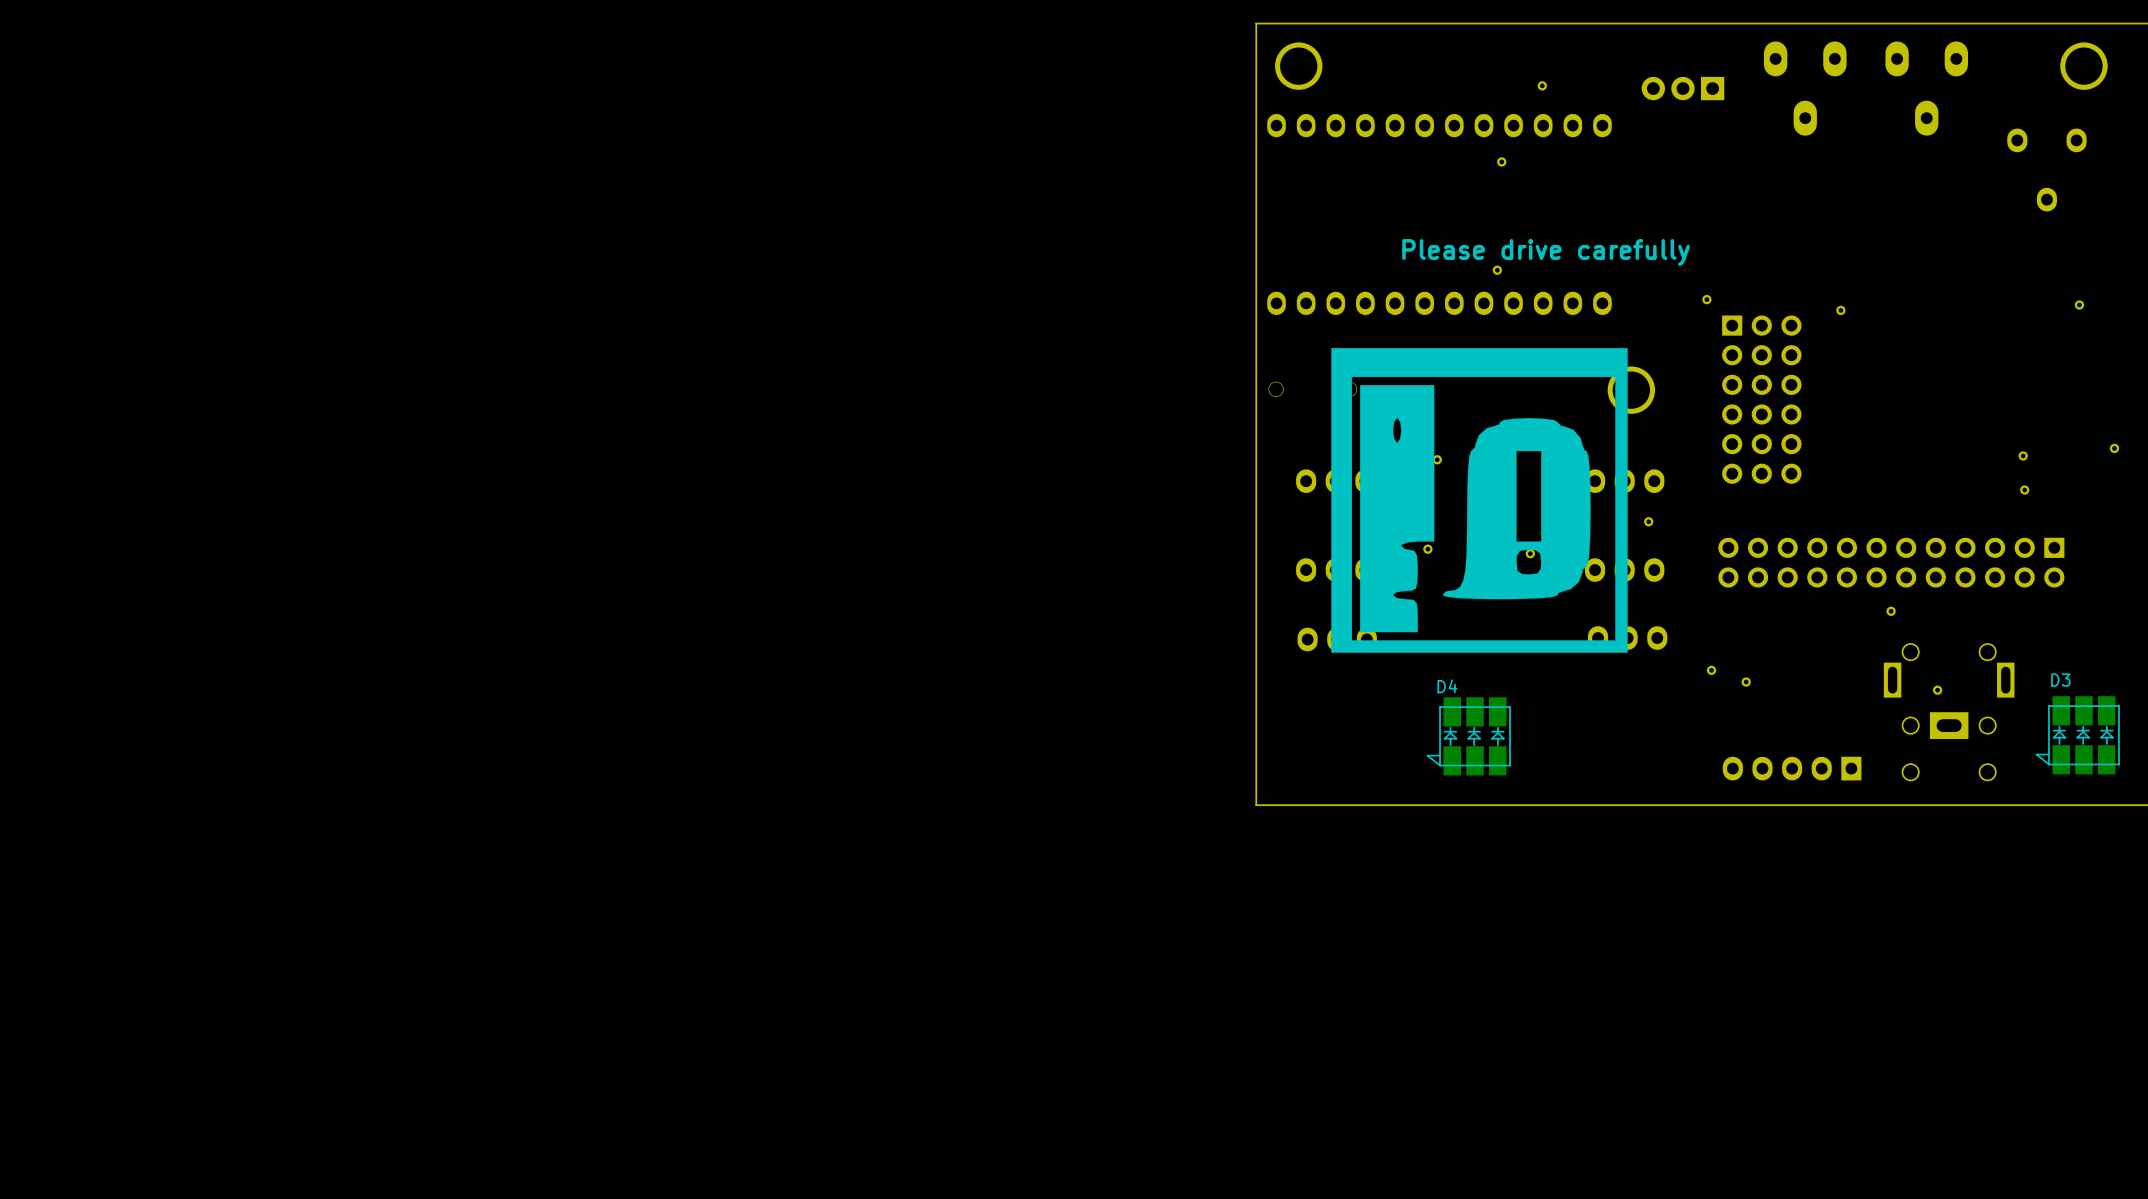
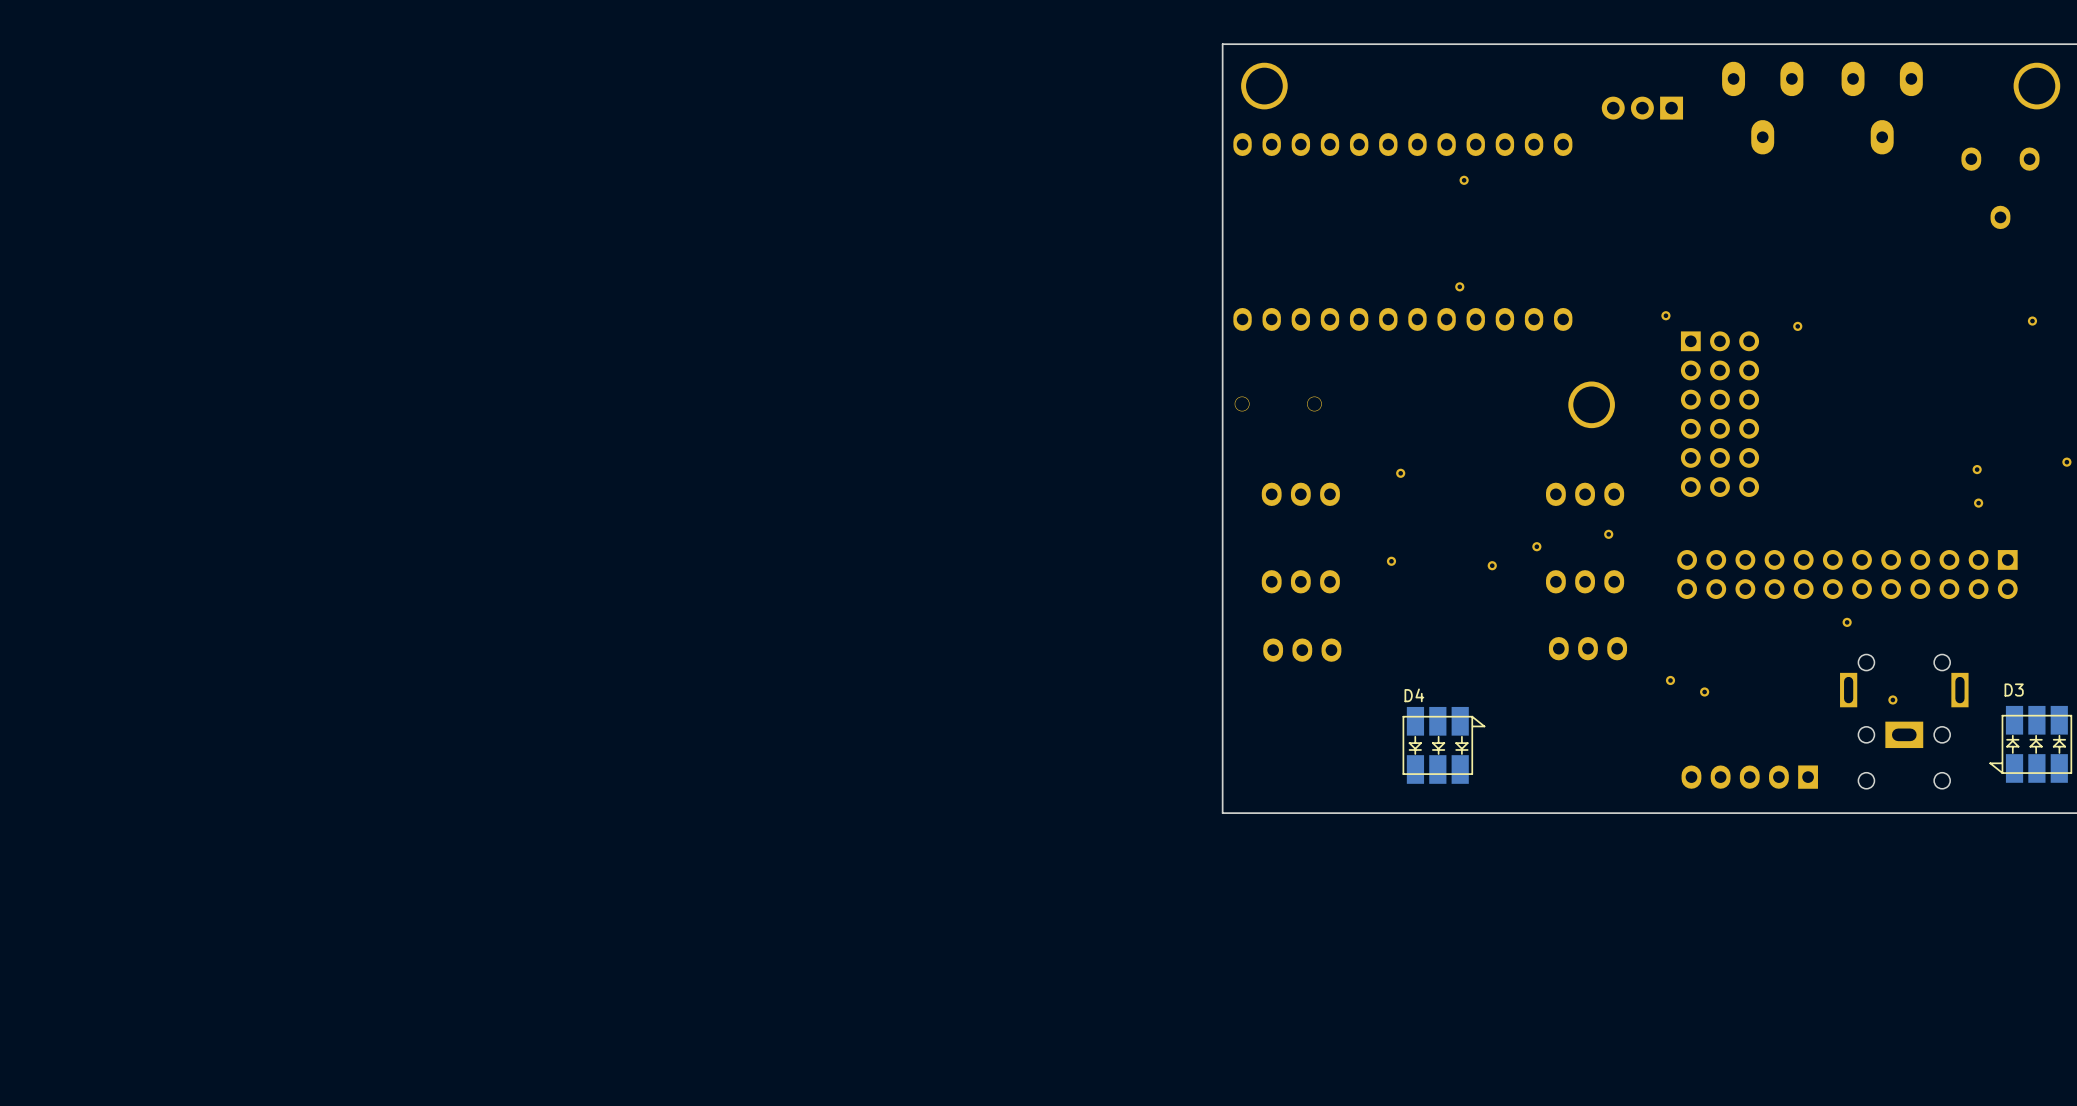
part: (1542, 85) -> none
text: Please drive carefully (1546, 252) -> none
drawing: [1331, 348, 1628, 653] -> none
D4 rotation: 0° (1468, 736) -> 180° (1443, 745)

